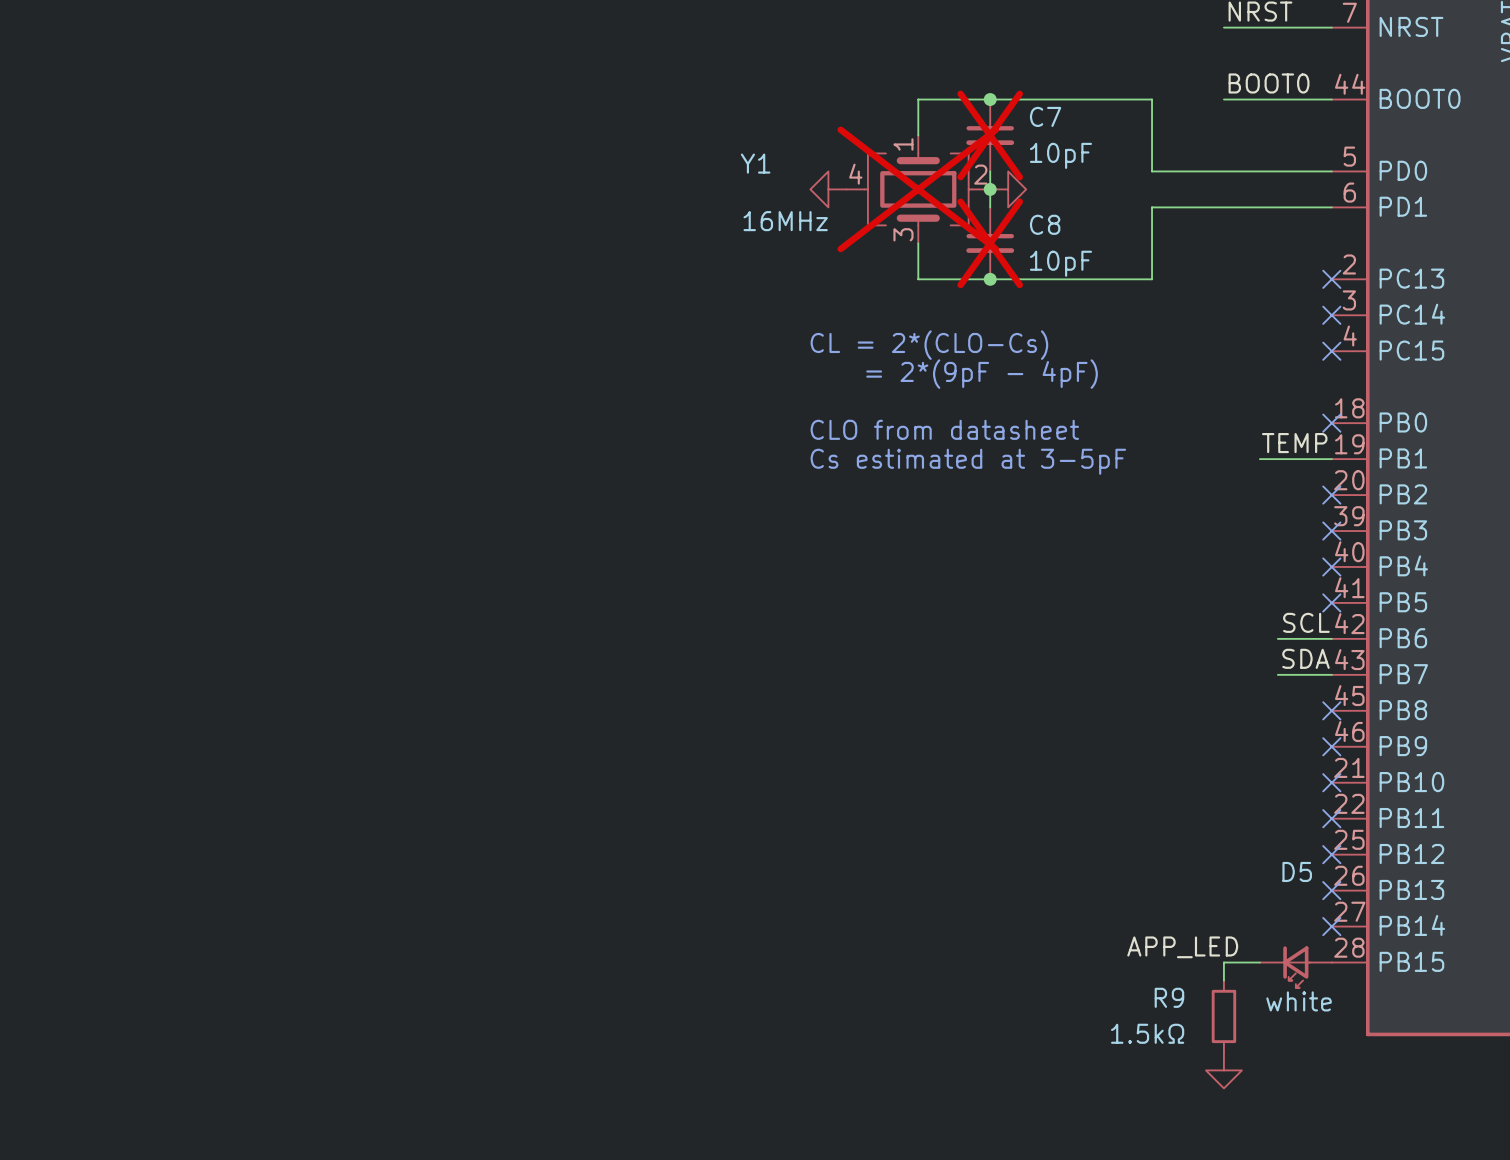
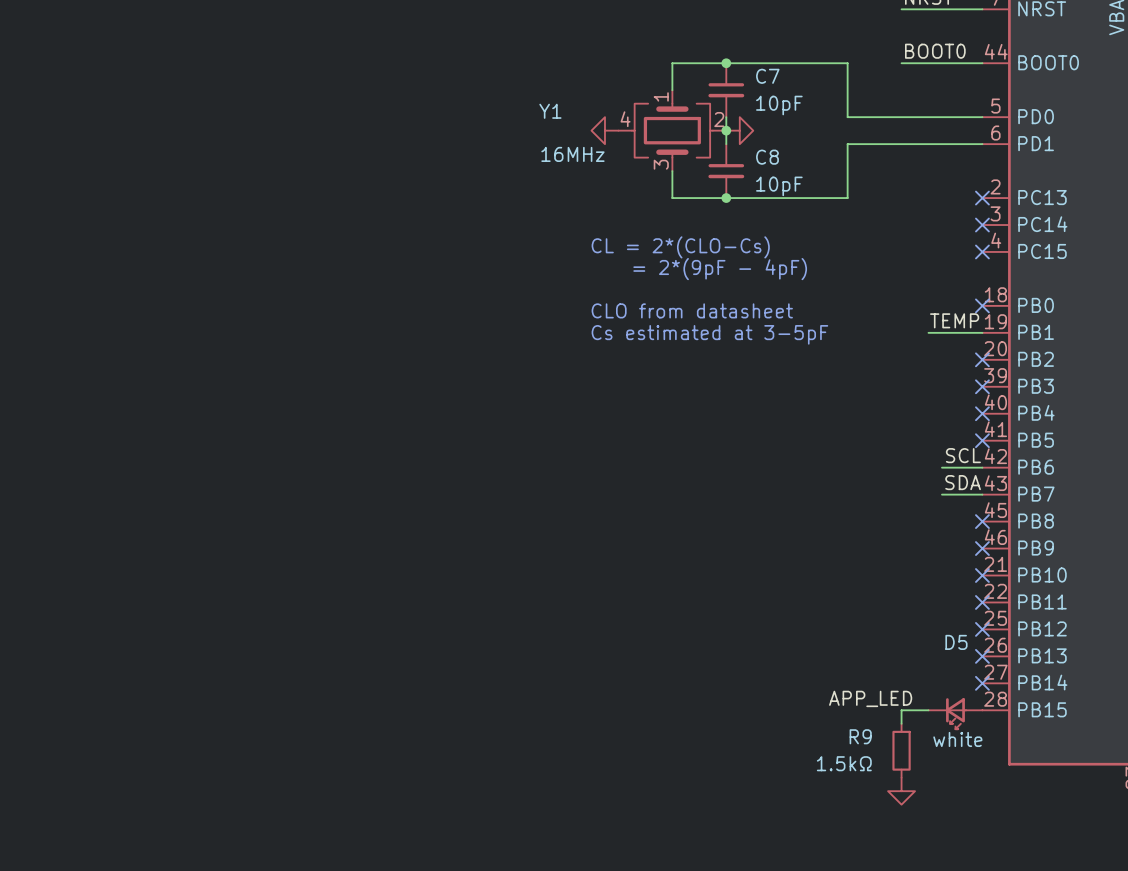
C7 do-not-place cross: (990, 135) -> none
Y1 do-not-place cross: (918, 189) -> none
C8 do-not-place cross: (990, 243) -> none

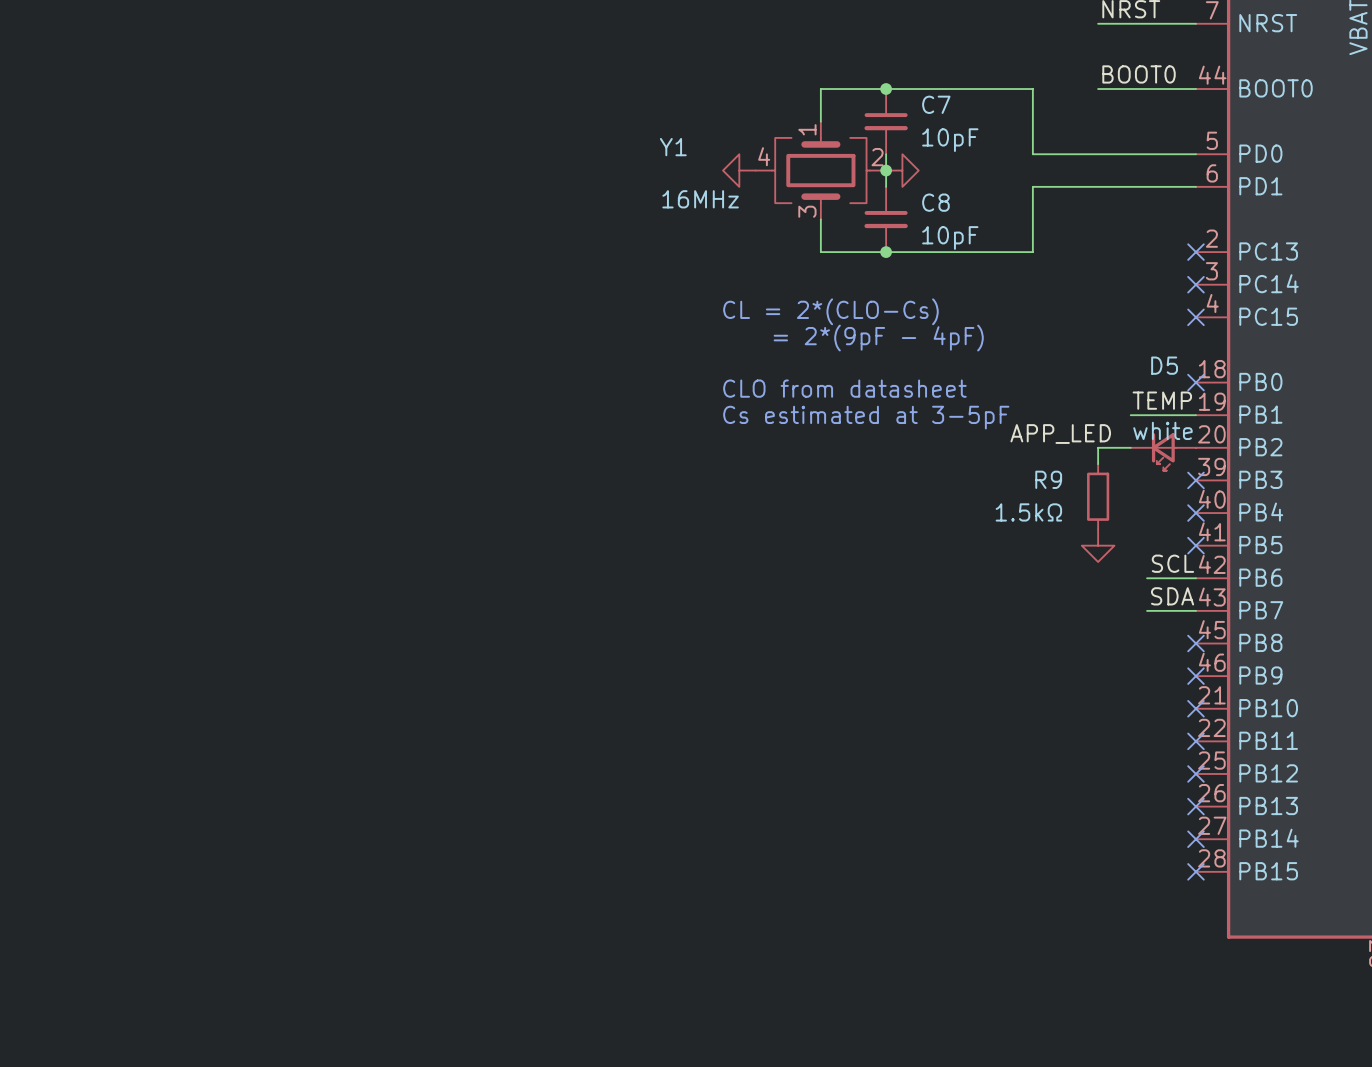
label: none -> APP_LED (1060, 434)
wire: none -> (1130, 447) (1098, 447) (1098, 464)
no-connect mark: (982, 359) -> none
power symbol: none -> (1098, 545)
label: APP_LED (870, 698) -> none
wire: (928, 710) (901, 710) (901, 723) -> none
no-connect mark: none -> (1195, 871)
D5 position: (955, 713) -> (1163, 451)
D5 value position: white (957, 739) -> white (1162, 430)
R9 position: (901, 750) -> (1098, 496)
power symbol: (901, 791) -> none

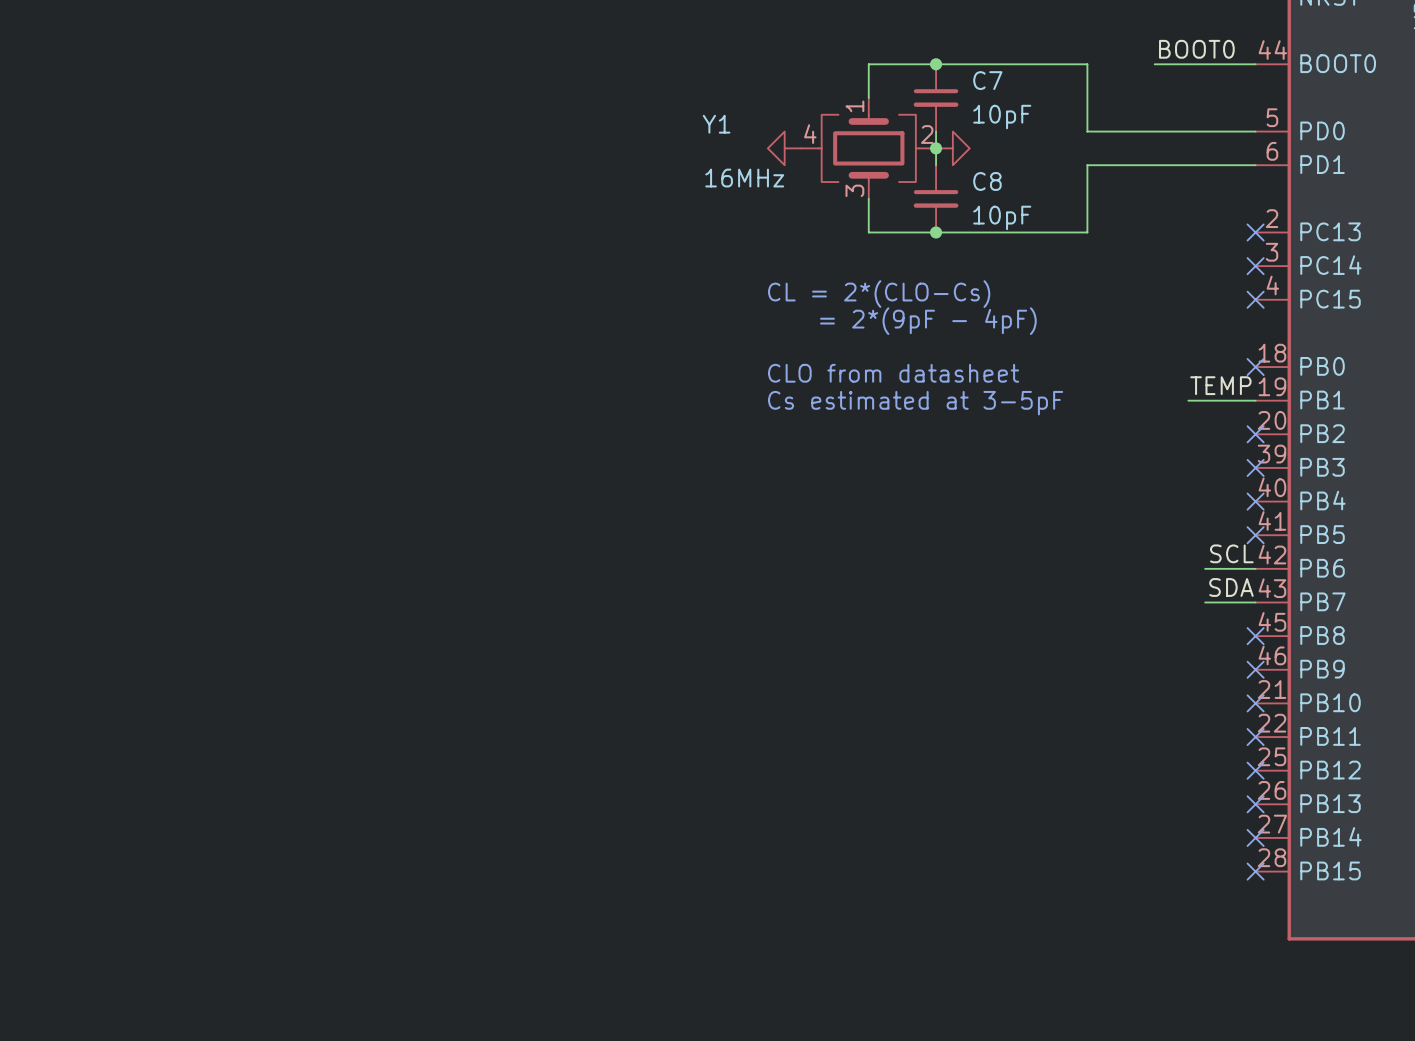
label: APP_LED (1060, 434) -> none
wire: (1130, 447) (1098, 447) (1098, 464) -> none
no-connect mark: none -> (1255, 434)
D5: white (1163, 451) -> none
R9: 1.5kΩ (1098, 496) -> none
power symbol: (1098, 545) -> none

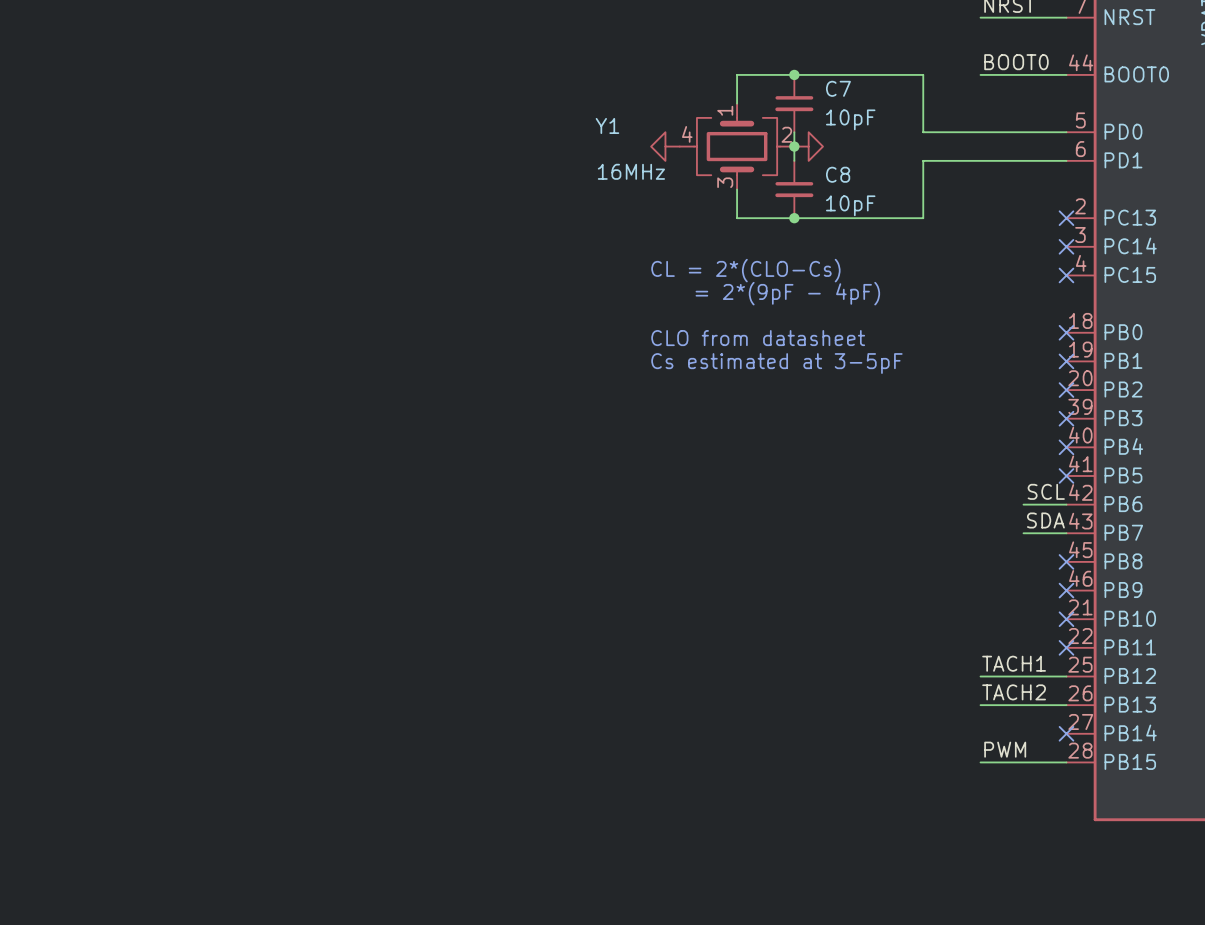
label: TEMP (1220, 385) -> none
wire: (1188, 400) (1255, 400) -> none
no-connect mark: none -> (1066, 361)
label: none -> TACH1 (1014, 663)
wire: none -> (980, 676) (1066, 676)
no-connect mark: (1255, 770) -> none
label: none -> TACH2 (1014, 692)
wire: none -> (980, 705) (1066, 705)
no-connect mark: (1255, 804) -> none
label: none -> PWM (1005, 749)
wire: none -> (980, 762) (1066, 762)
no-connect mark: (1255, 871) -> none

